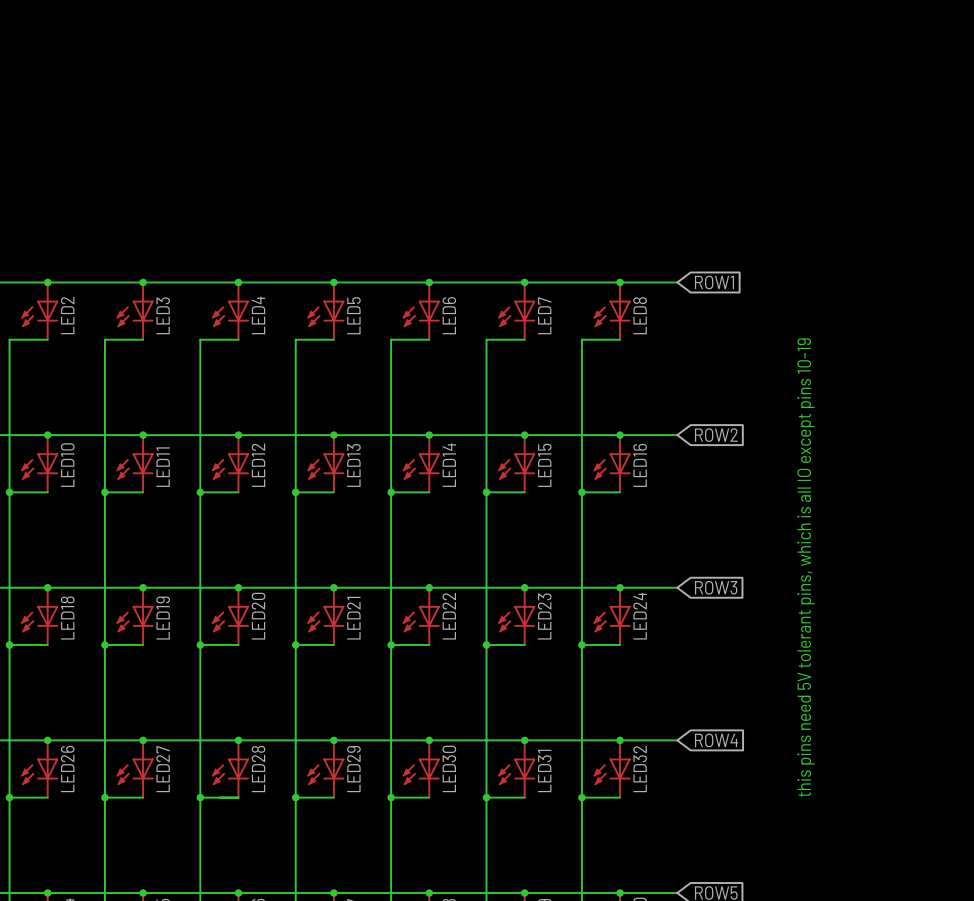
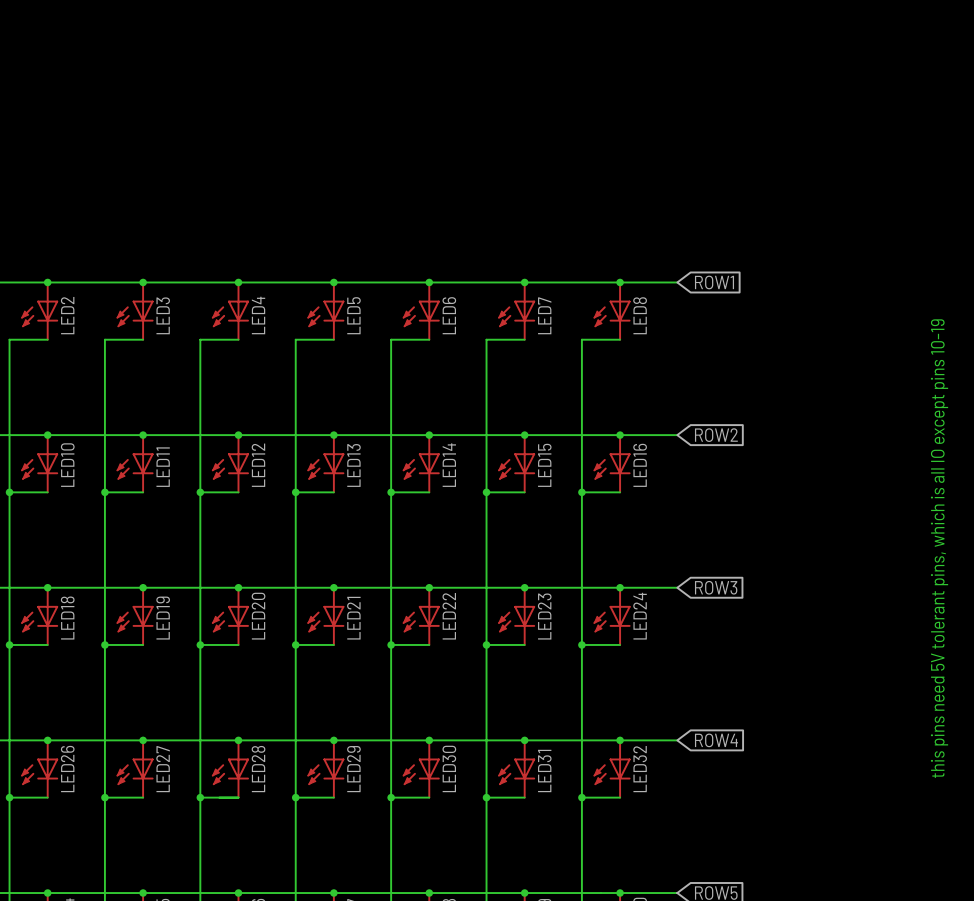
text position: this pins need 5V tolerant pins, which is all IO except pins 10-19 (805, 567) -> this pins need 5V tolerant pins, which is all IO except pins 10-19 (939, 548)

